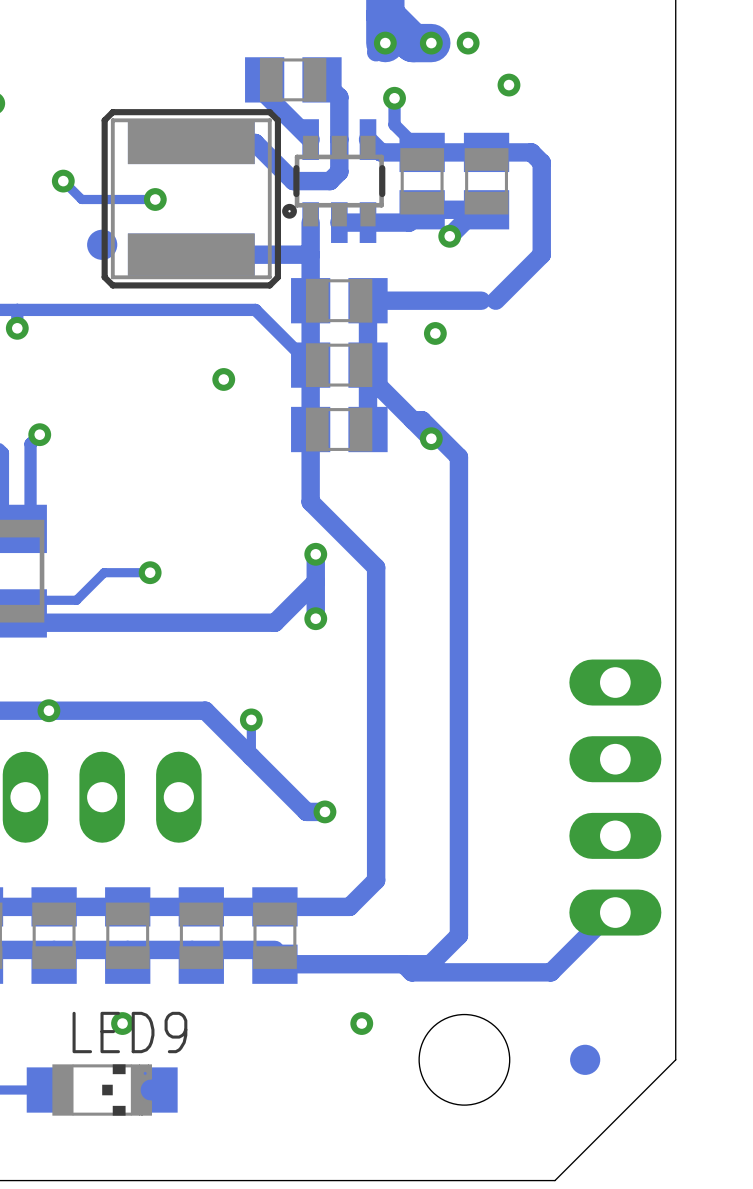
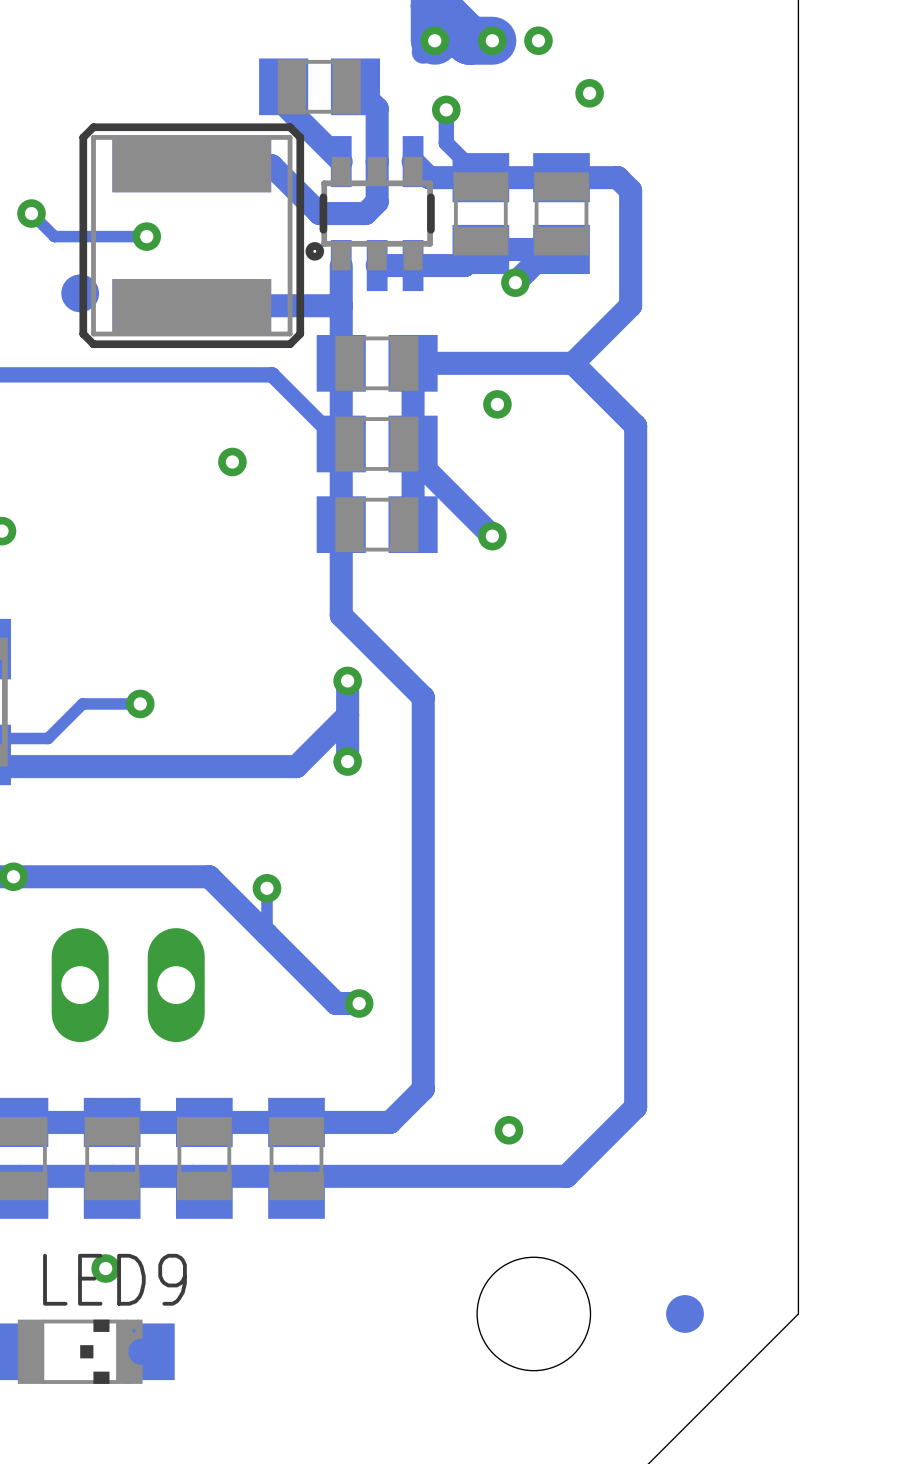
track: none -> (555, 363) (573, 363) (635, 426) (635, 1107) (566, 1176) (296, 1176)
track: (412, 420) (422, 420) (458, 457) (458, 935) (430, 964) (274, 964) -> none
part: (615, 797) -> none
track: (615, 912) (610, 912) (550, 972) (411, 972) (403, 964) -> none
via position: (361, 1023) -> (508, 1130)

